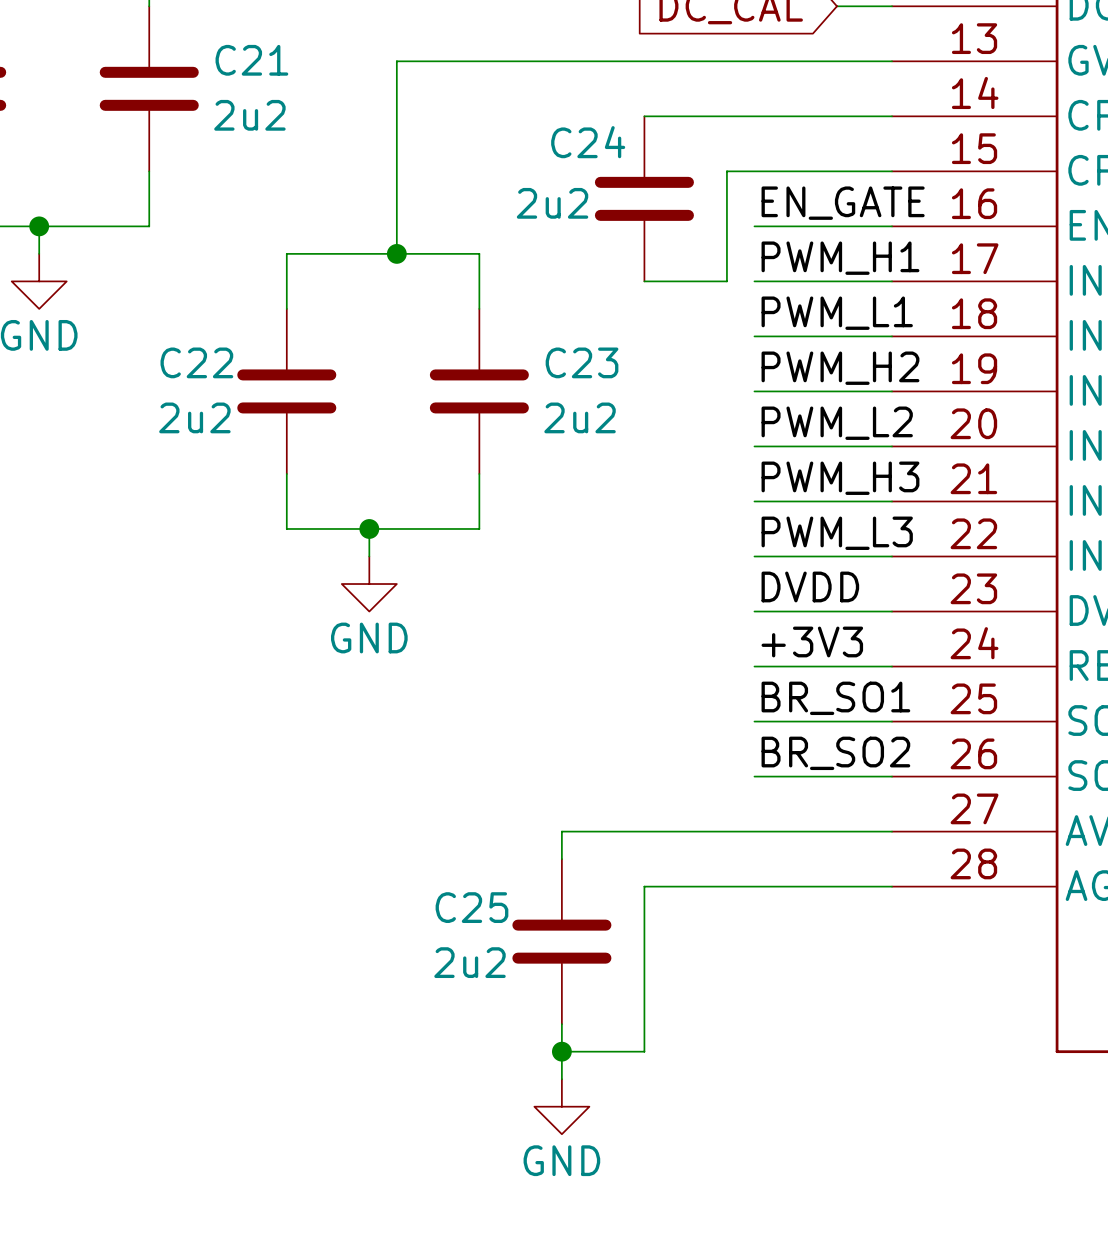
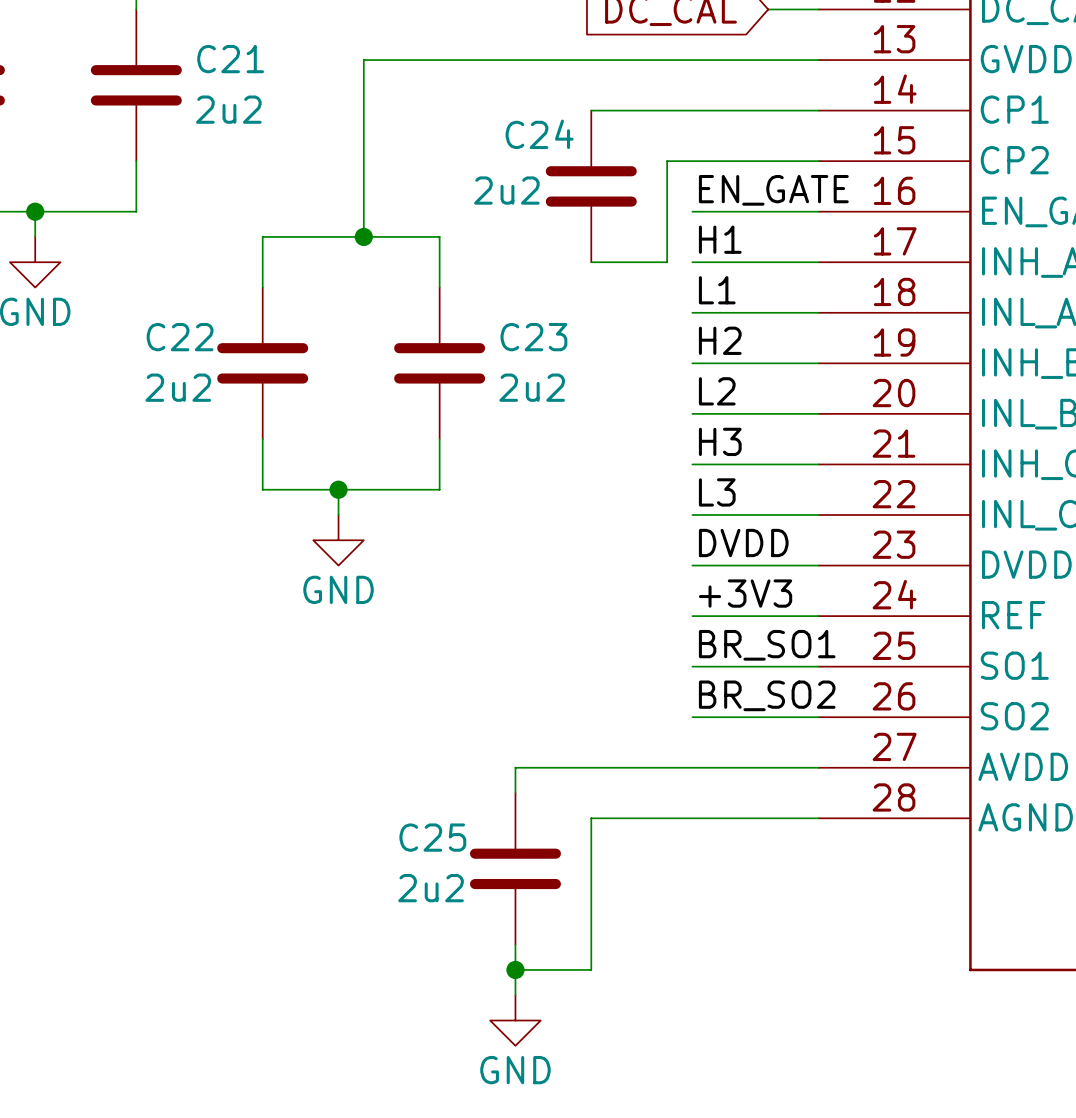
label: PWM_H1 (840, 258) -> H1 (720, 239)
label: PWM_L1 (837, 313) -> L1 (717, 290)
label: PWM_H2 (840, 368) -> H2 (720, 340)
label: PWM_L2 (837, 423) -> L2 (717, 391)
label: PWM_H3 (840, 478) -> H3 (720, 441)
label: PWM_L3 (837, 533) -> L3 (717, 492)

